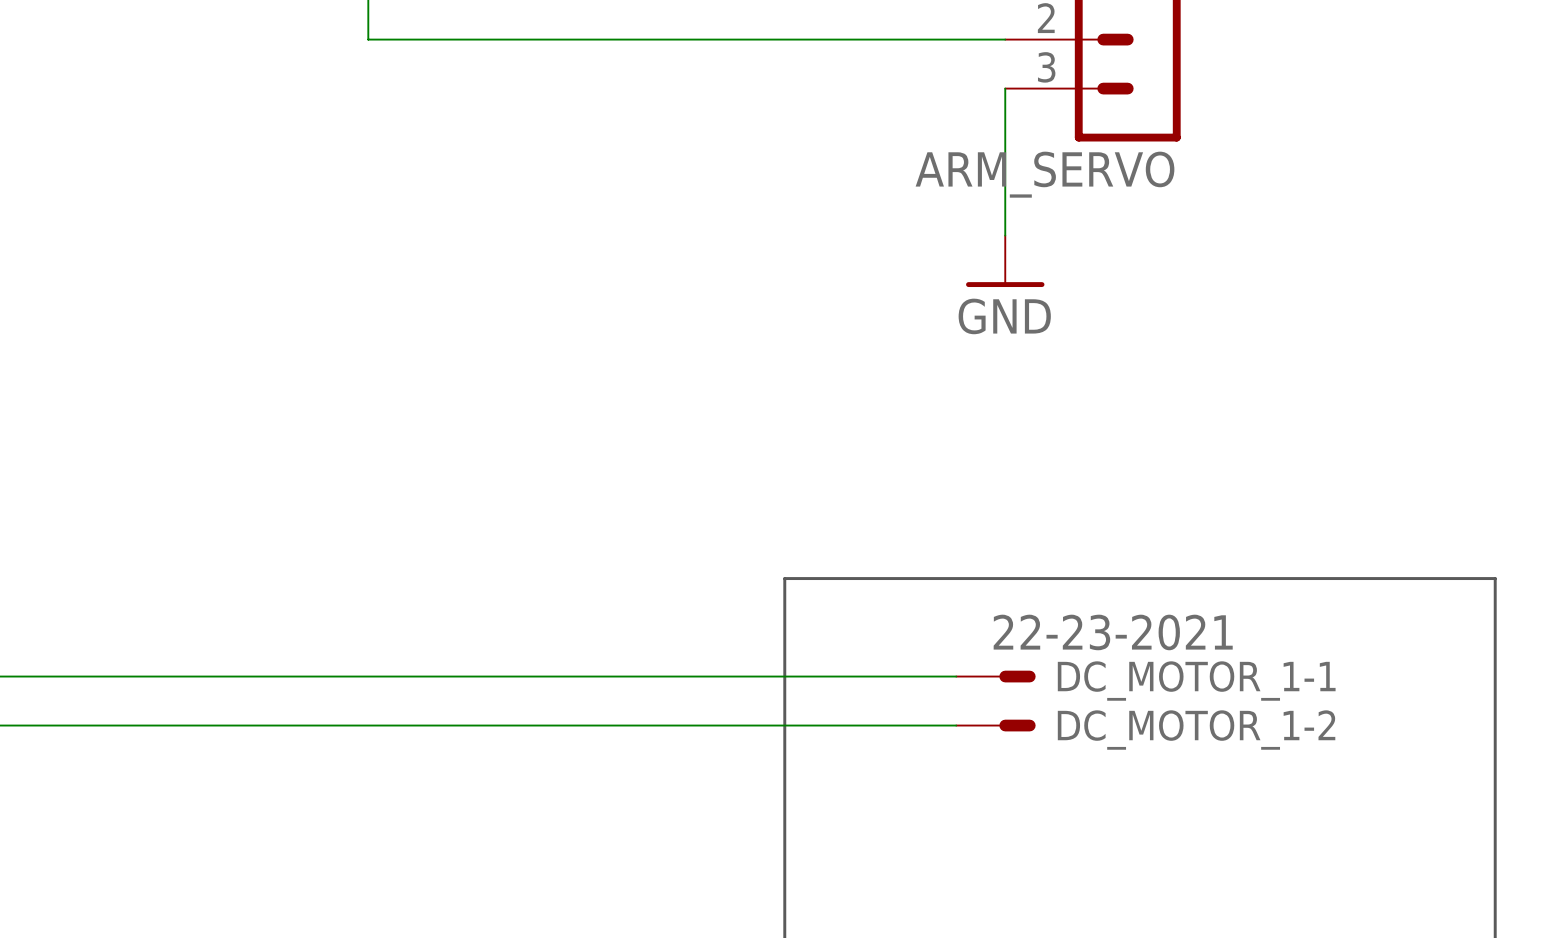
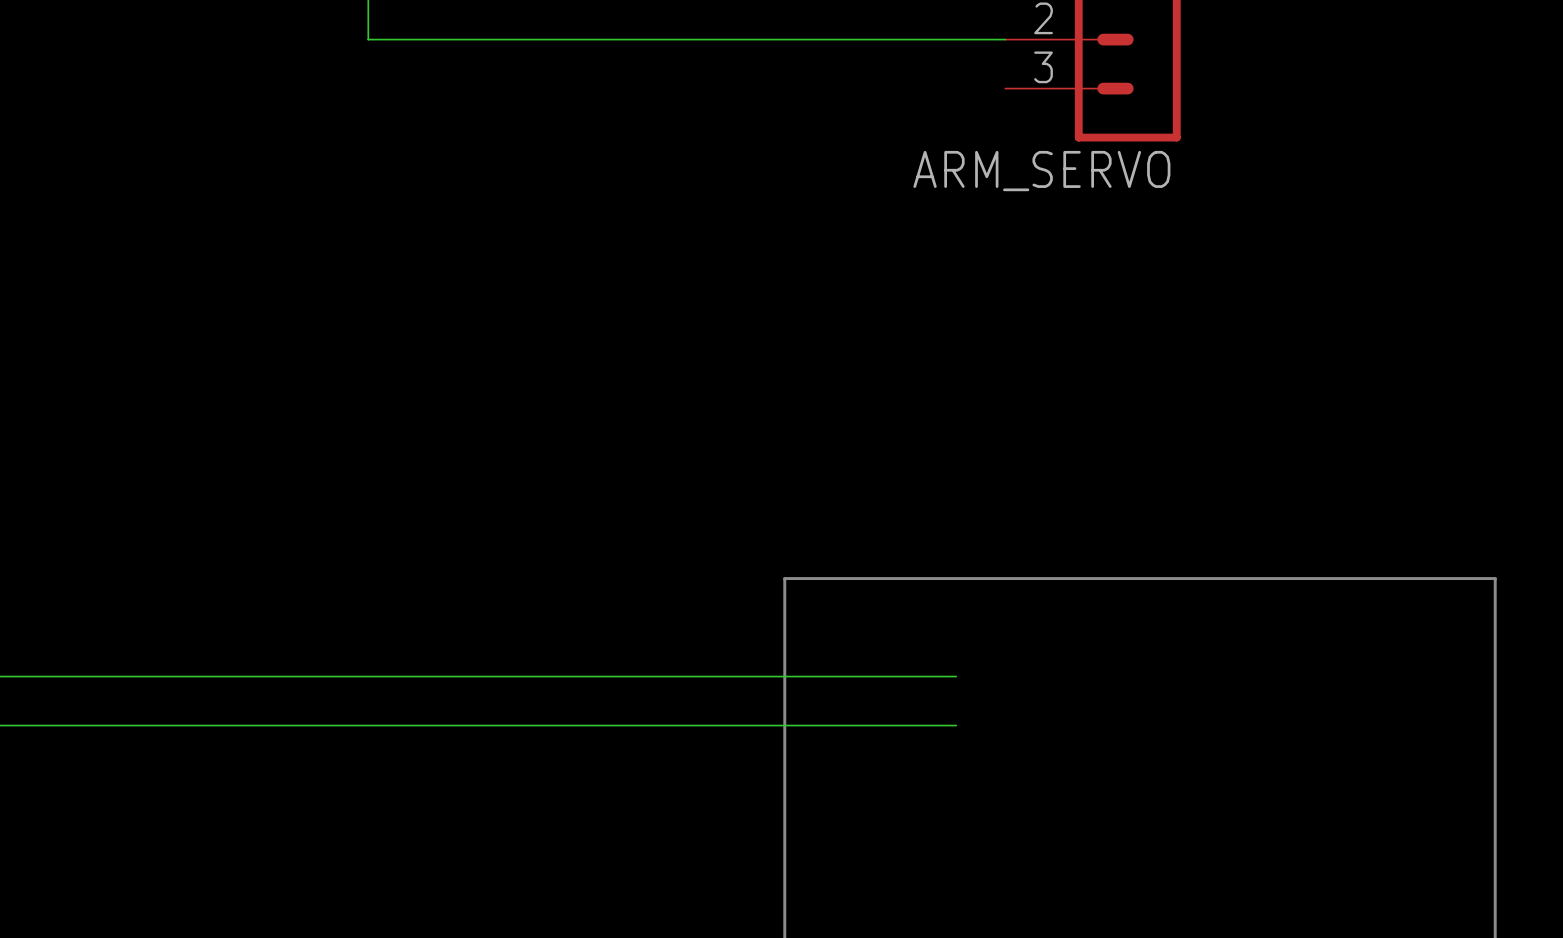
wire: (1005, 88) (1005, 235) -> none
power symbol: GND (1005, 261) -> none
DC_MOTOR_1-1: 22-23-2021 (995, 676) -> none
DC_MOTOR_1-2: (995, 725) -> none

